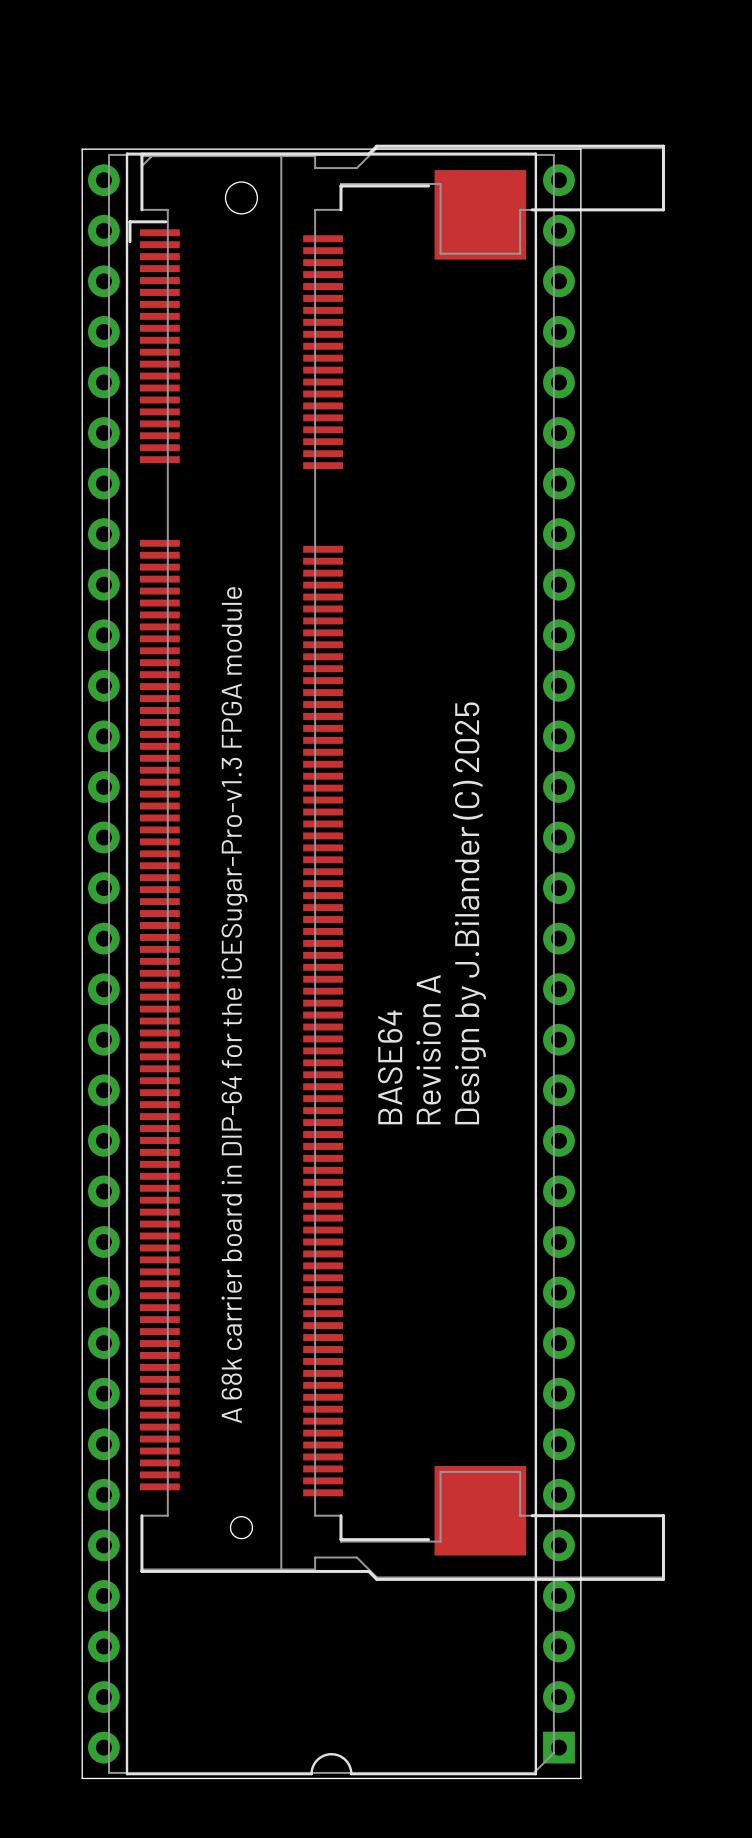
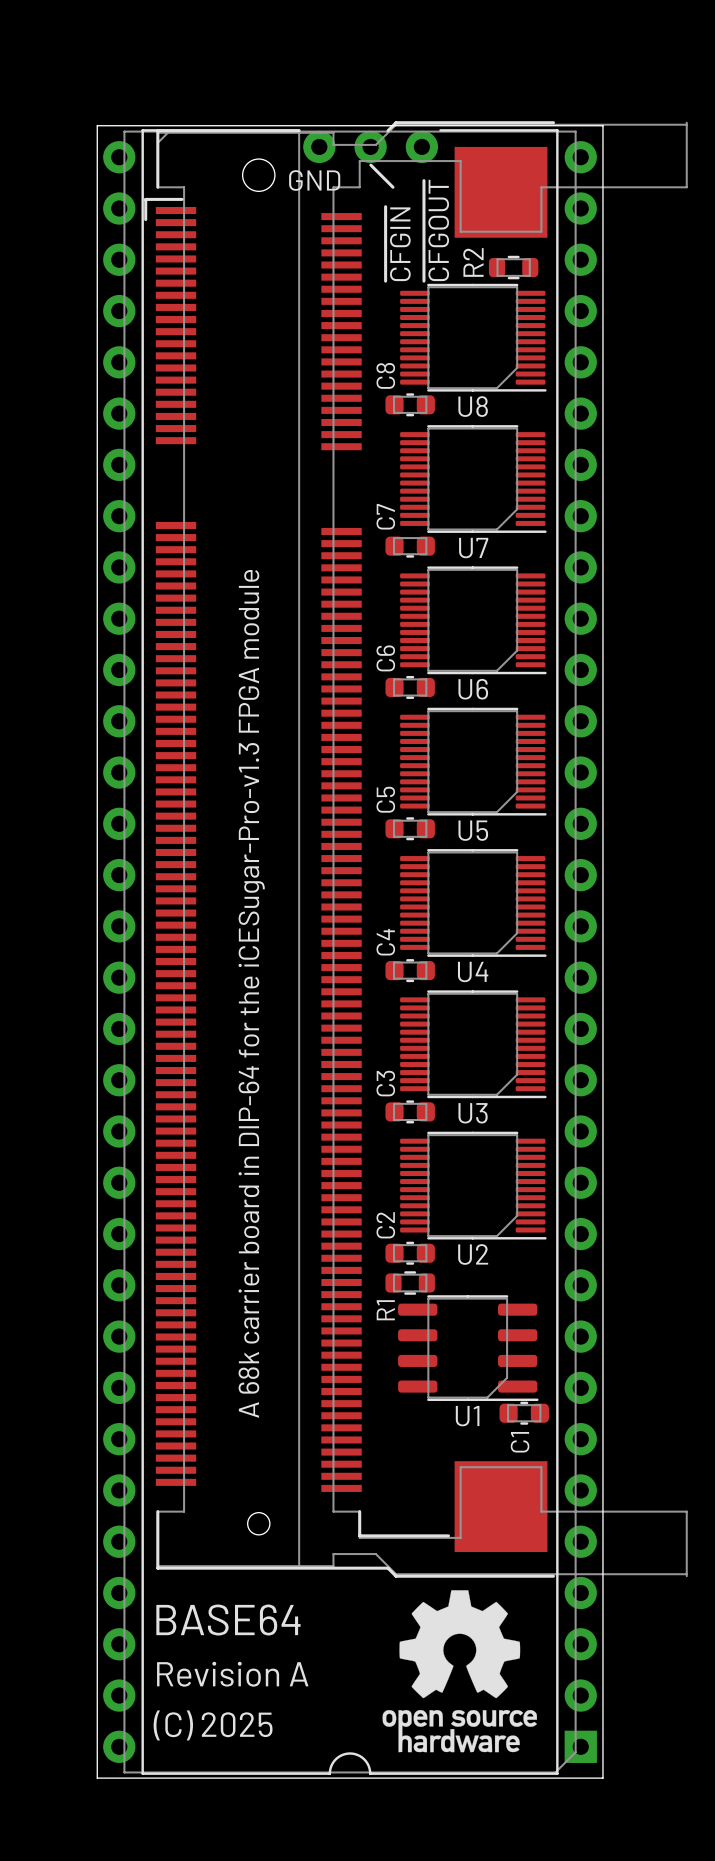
part footprint: [128, 144, 665, 1581] -> [144, 121, 688, 1578]
part footprint: [87, 152, 575, 1776] -> [103, 129, 597, 1775]
part: none -> (370, 146)
line: none -> (370, 165) (393, 187)
text: none -> GND (314, 180)
text: none -> ~{CFGOUT} (436, 230)
text: none -> ~{CFGIN} (398, 243)
R2: none -> (513, 267)
U8: none -> (473, 337)
C8: none -> (410, 404)
U7: none -> (473, 479)
C7: none -> (410, 547)
U6: none -> (473, 620)
C6: none -> (410, 687)
U5: none -> (473, 761)
C5: none -> (410, 828)
text: Design by J.Bilander (C) 2025 (469, 913) -> none
U4: none -> (473, 902)
C4: none -> (410, 970)
text: Revision A (428, 1049) -> none
U3: none -> (473, 1044)
text: BASE64 (390, 1067) -> none
C3: none -> (410, 1111)
U2: none -> (473, 1185)
C2: none -> (410, 1253)
R1: none -> (410, 1283)
U1: none -> (468, 1348)
C1: none -> (524, 1413)
drawing: none -> [382, 1590, 538, 1753]
text: none -> BASE64 (228, 1620)
text: none -> Revision A (232, 1674)
text: none -> (C) 2025 (213, 1725)

